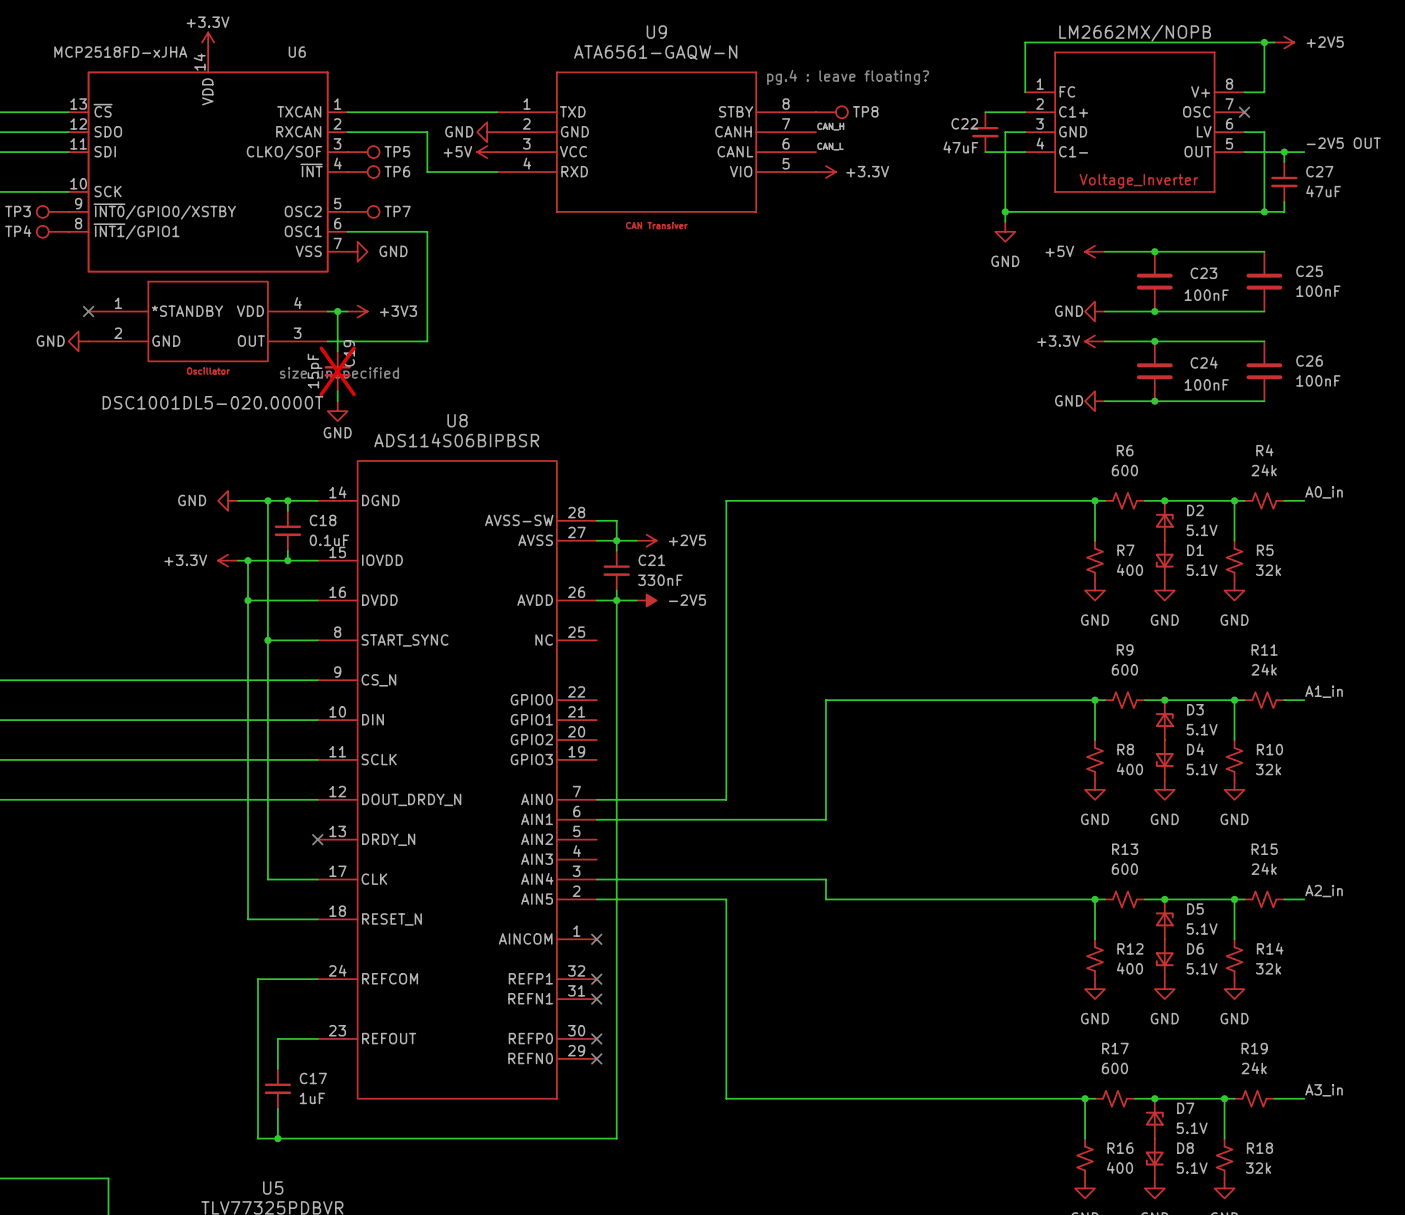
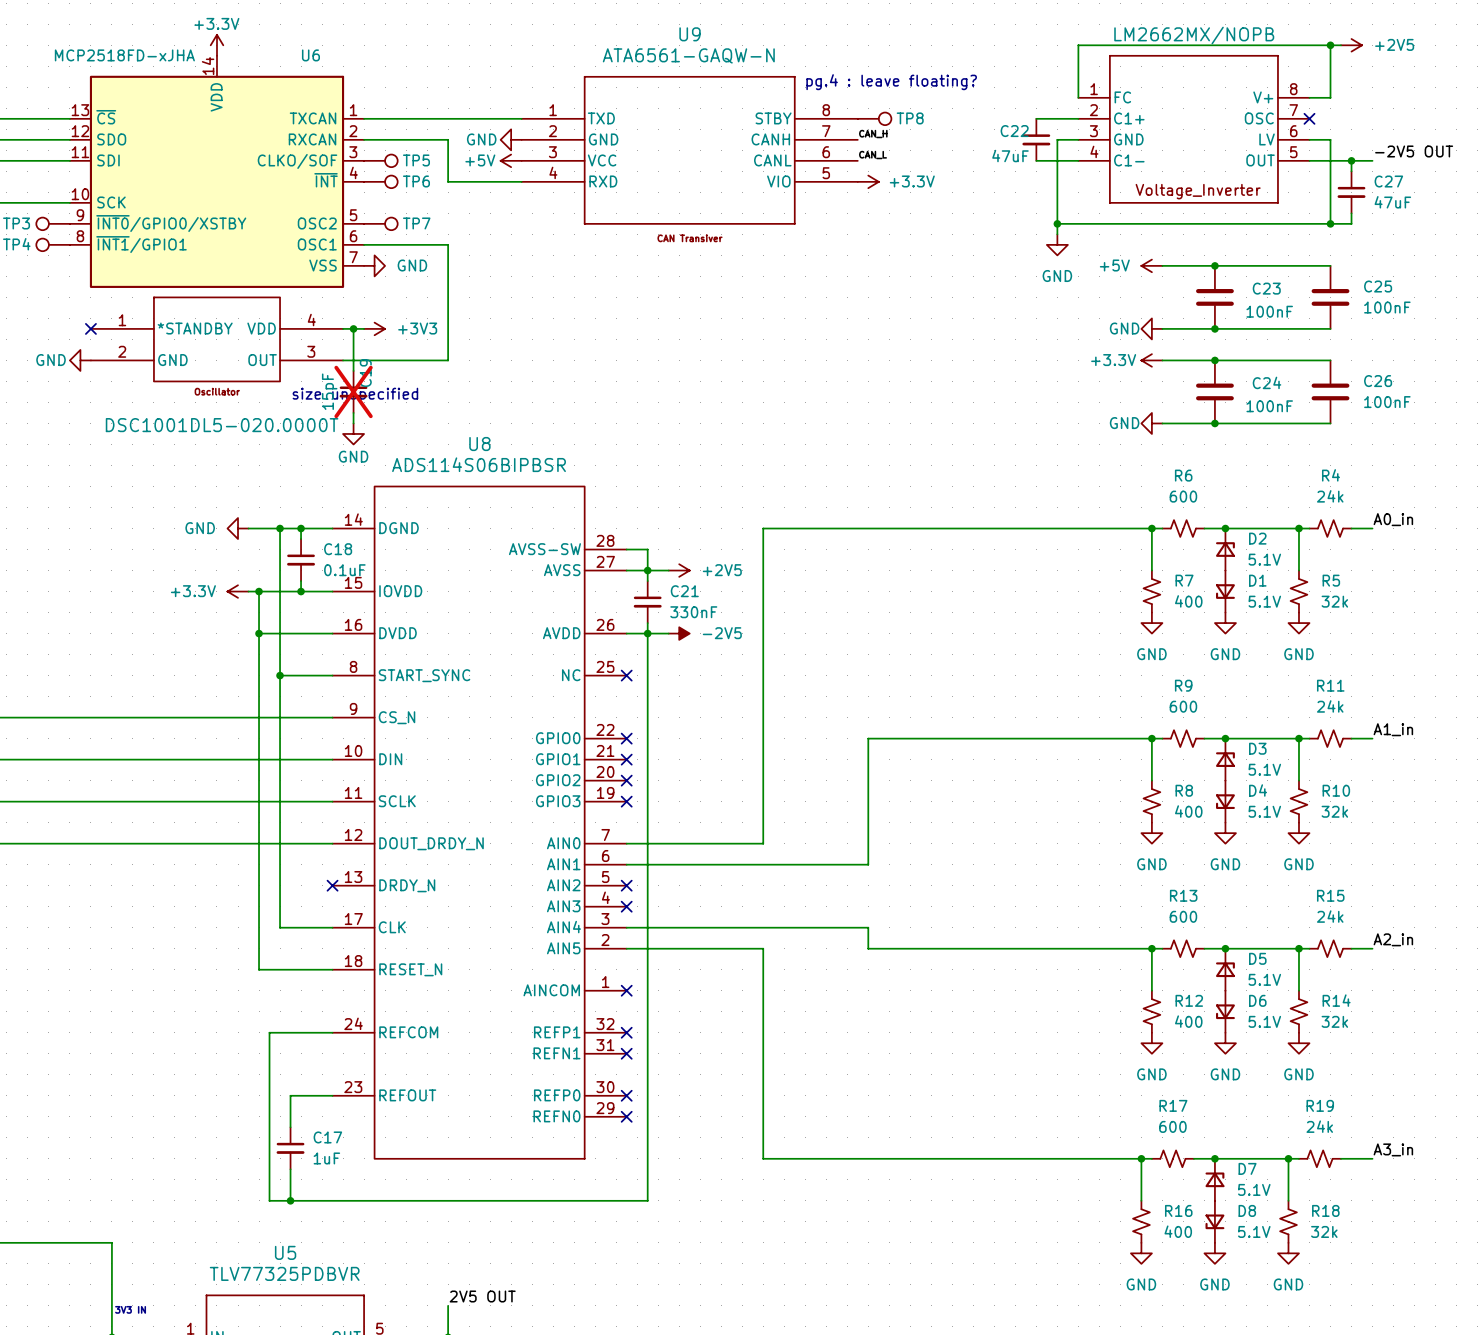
no-connect mark: none -> (626, 675)
no-connect mark: none -> (626, 738)
no-connect mark: none -> (626, 759)
no-connect mark: none -> (626, 780)
no-connect mark: none -> (626, 801)
no-connect mark: none -> (626, 885)
no-connect mark: none -> (626, 906)

